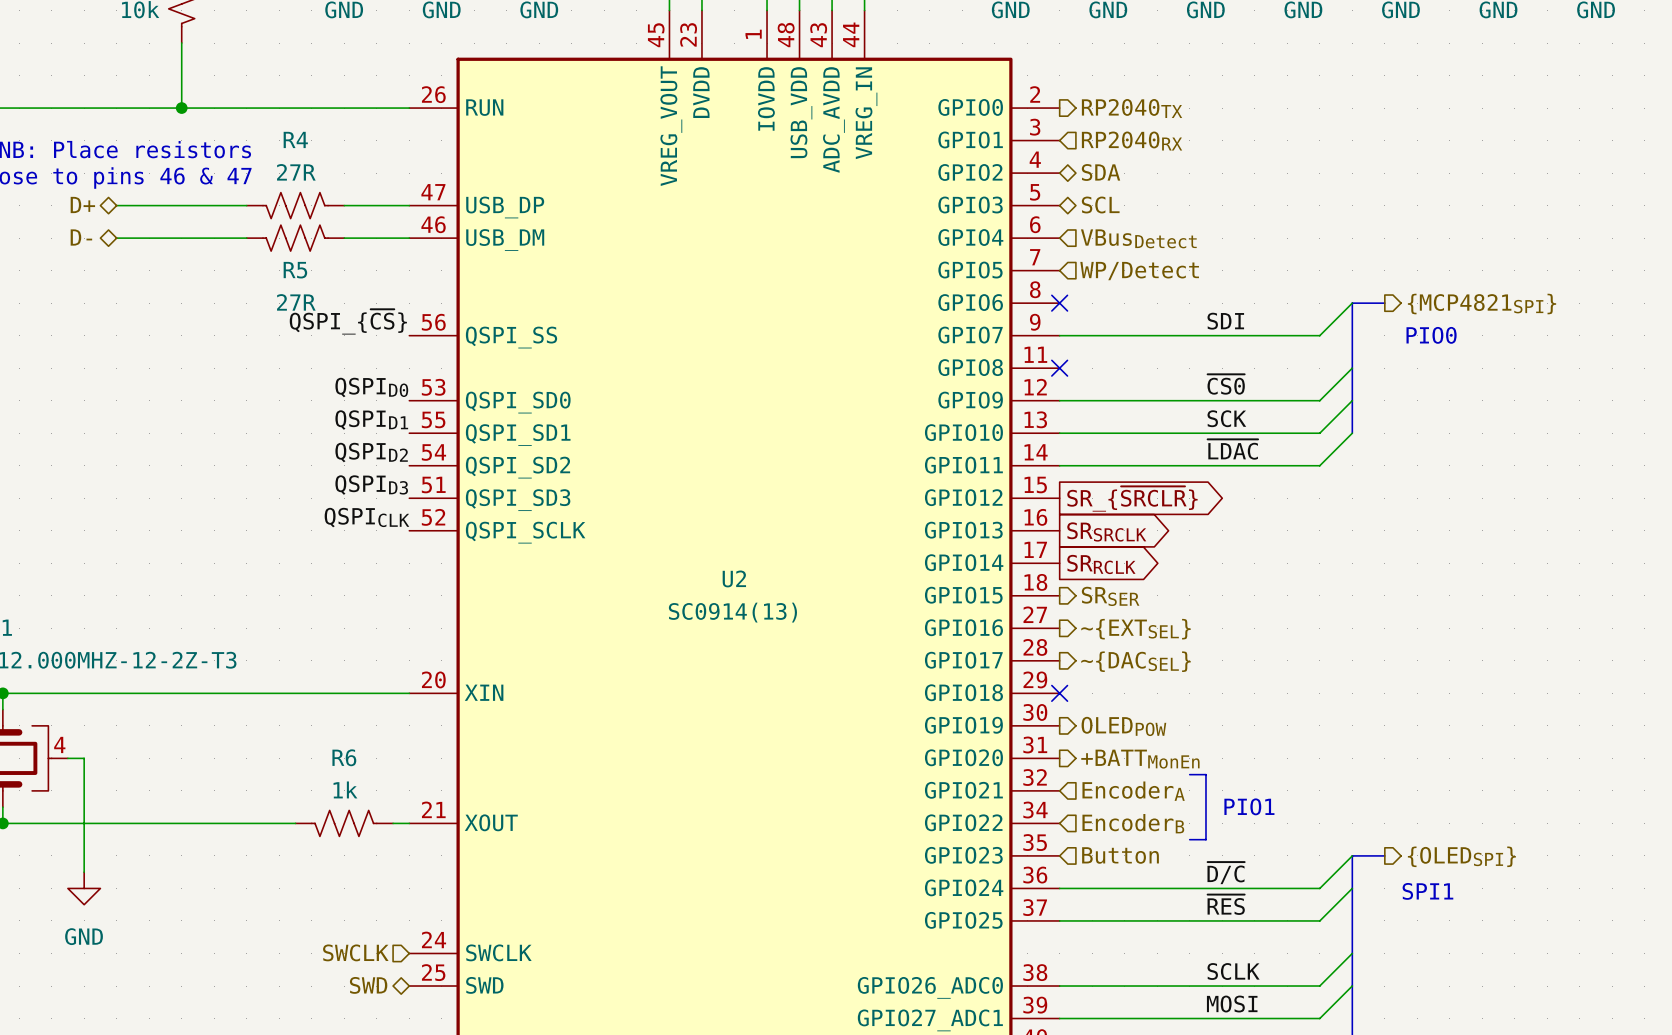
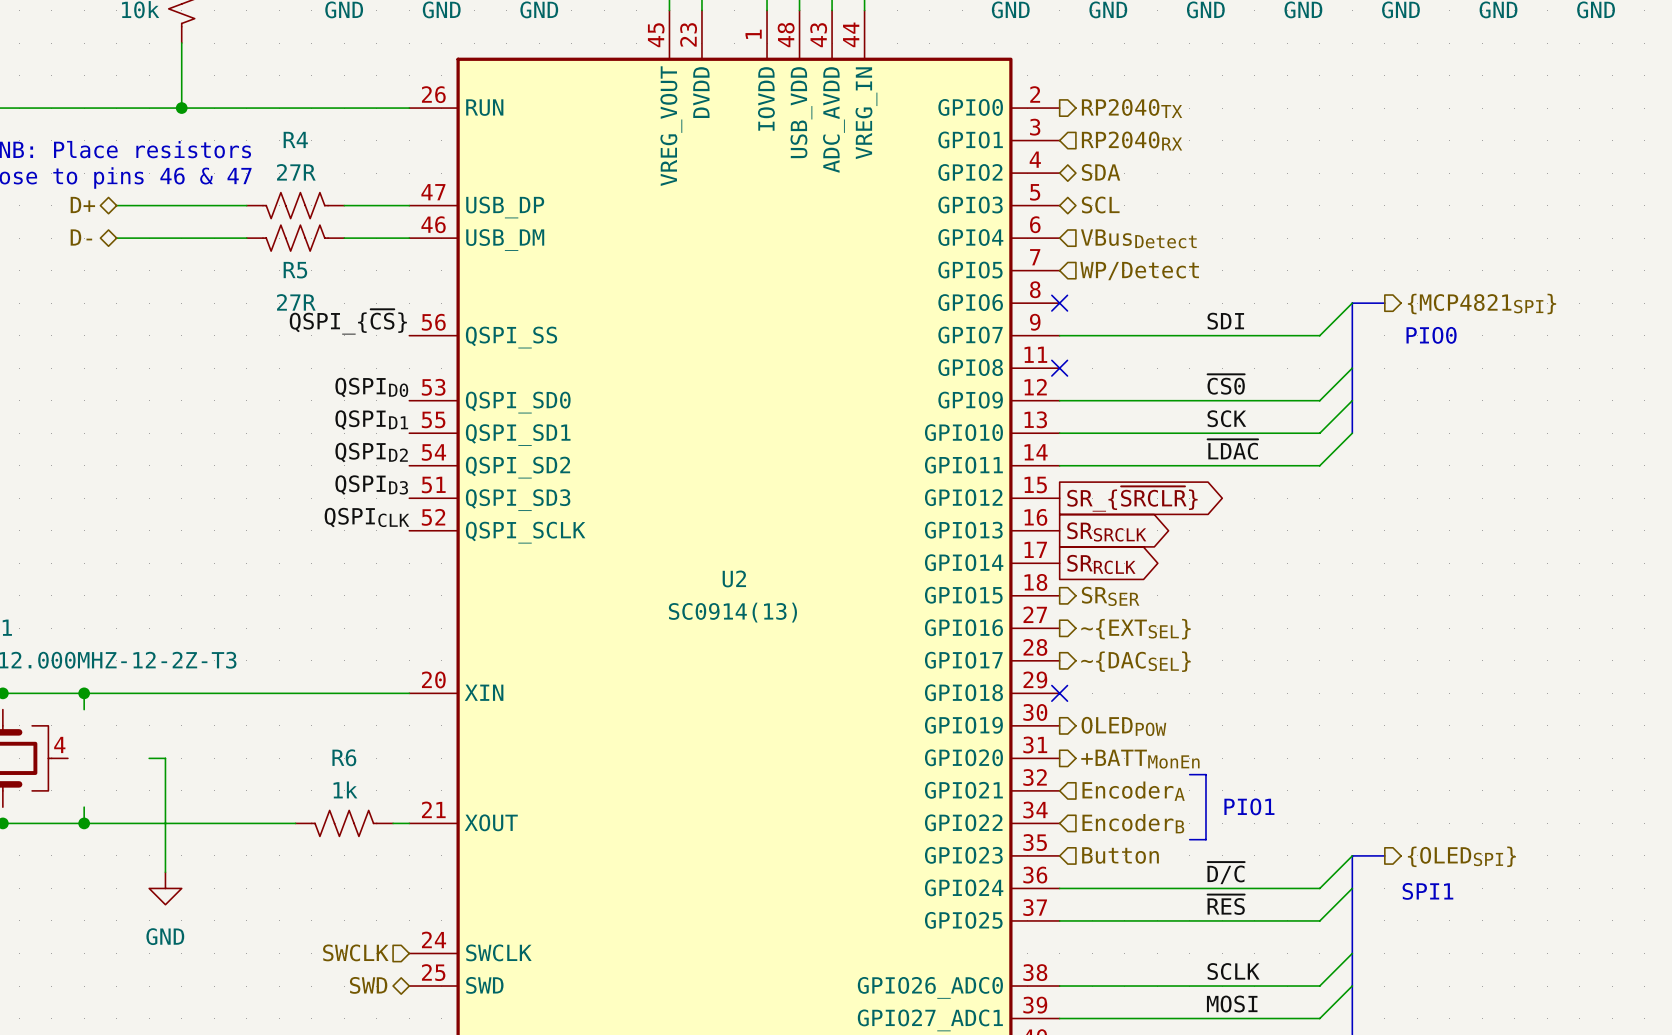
wire: (2, 693) (2, 709) -> (84, 693) (84, 709)
junction: none -> (84, 693)
wire: (67, 758) (84, 758) (84, 807) -> none
wire: none -> (149, 758) (165, 758) (165, 872)
wire: (2, 807) (2, 823) -> none
wire: (84, 823) (84, 872) -> none
junction: none -> (84, 823)
power symbol position: GND (84, 888) -> GND (165, 888)

